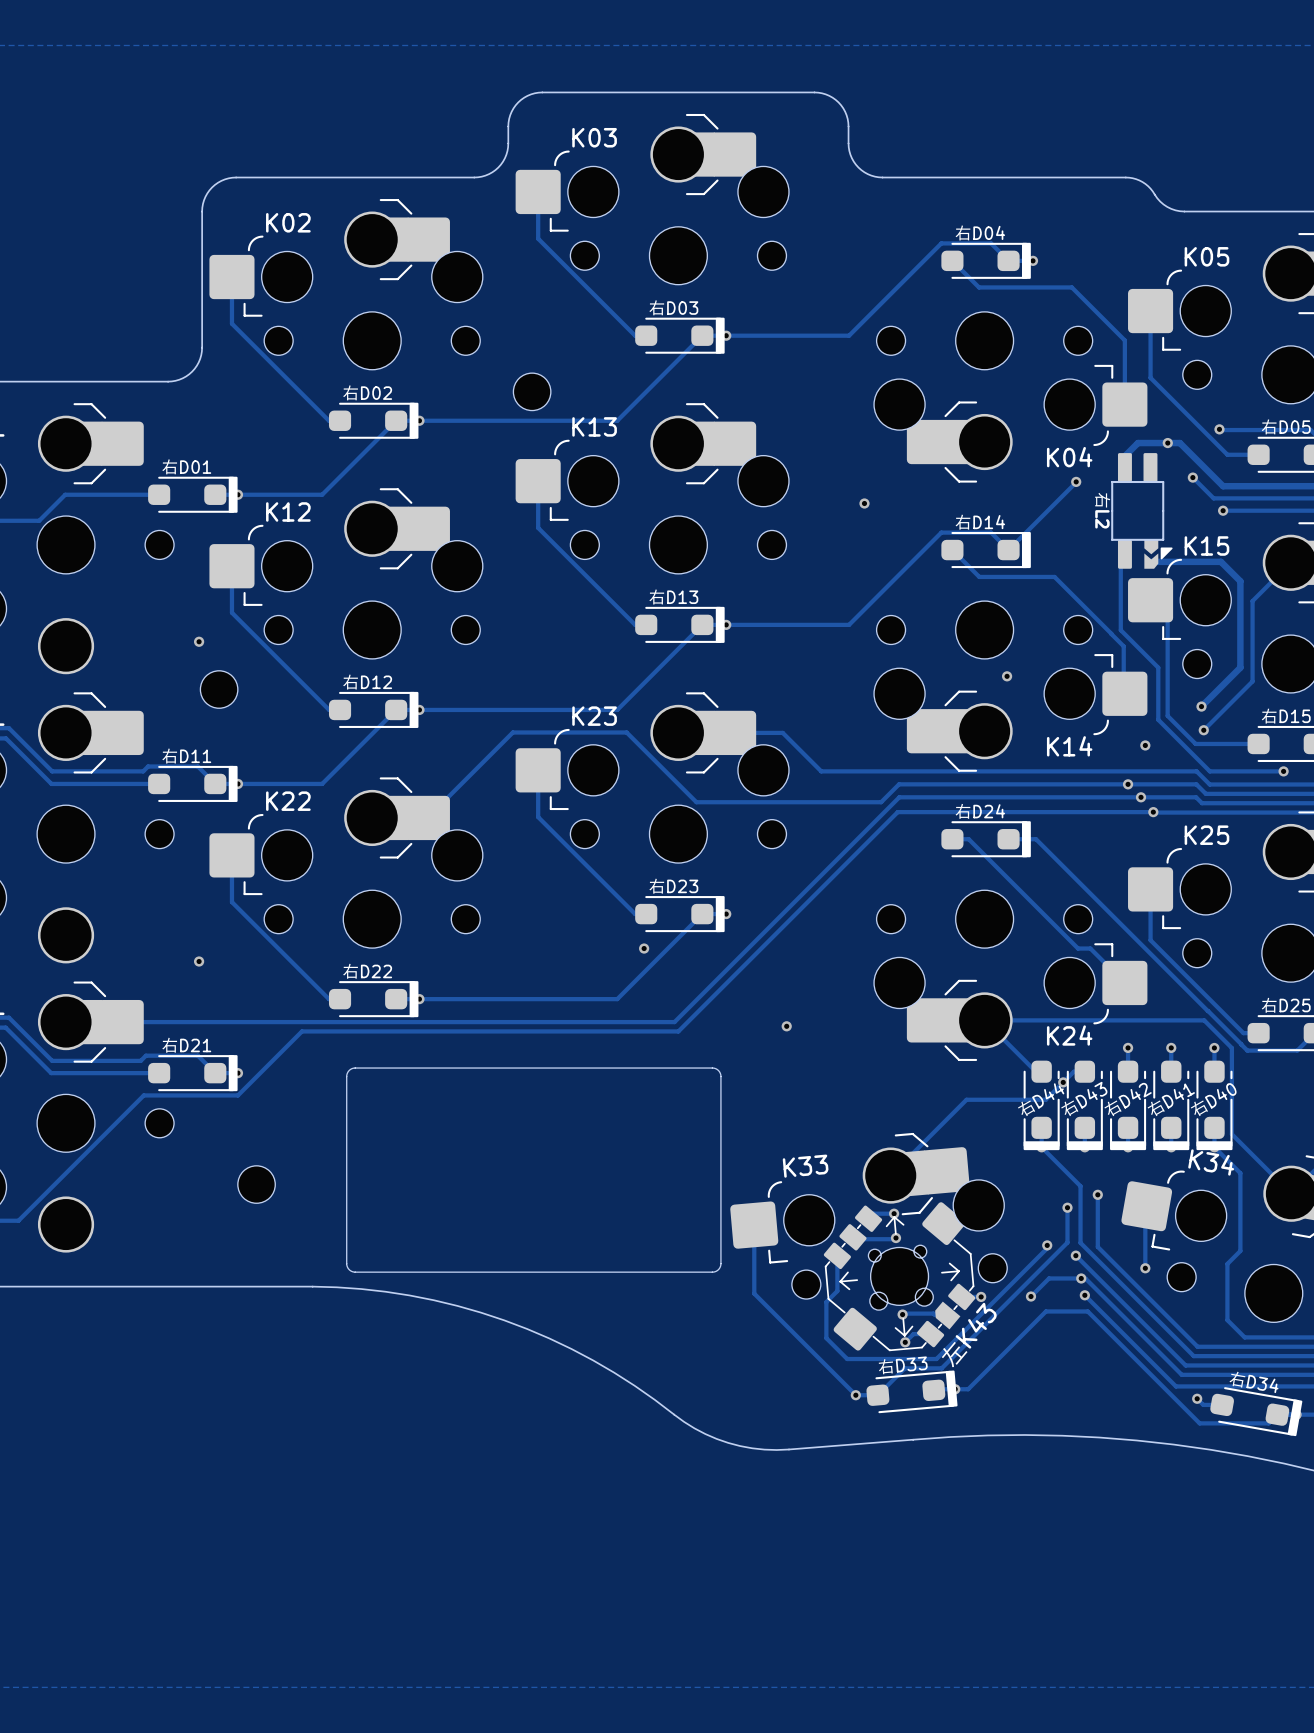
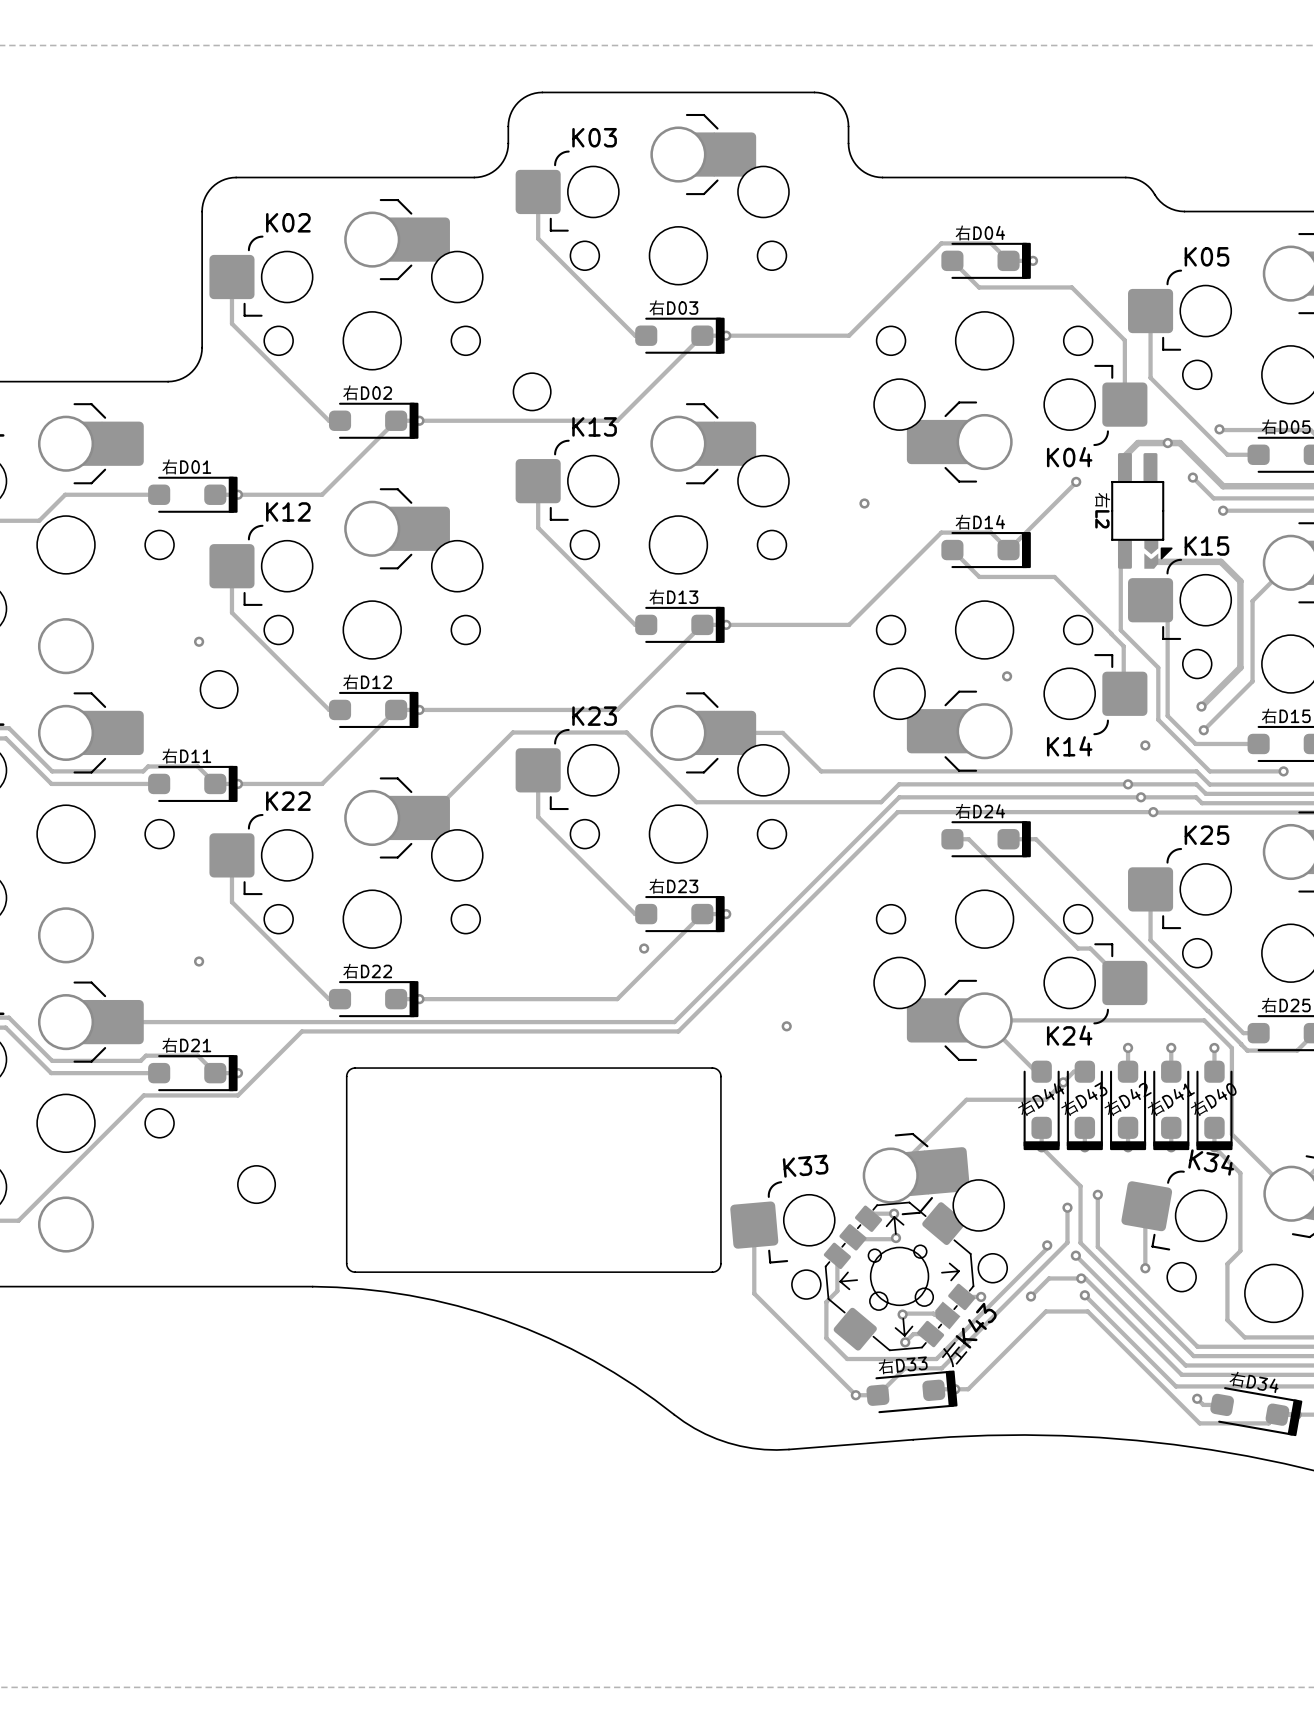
右D44 footprint: [1023, 1060, 1060, 1151] -> [1023, 1060, 1060, 1151]
右D43 footprint: [1066, 1060, 1103, 1151] -> [1066, 1060, 1103, 1151]
右D42 footprint: [1110, 1060, 1147, 1151] -> [1110, 1060, 1147, 1151]
右D41 footprint: [1153, 1060, 1190, 1151] -> [1153, 1060, 1190, 1151]
右D40 footprint: [1196, 1060, 1233, 1151] -> [1196, 1060, 1233, 1151]
左K43 footprint: [823, 1202, 976, 1352] -> [823, 1201, 976, 1352]

